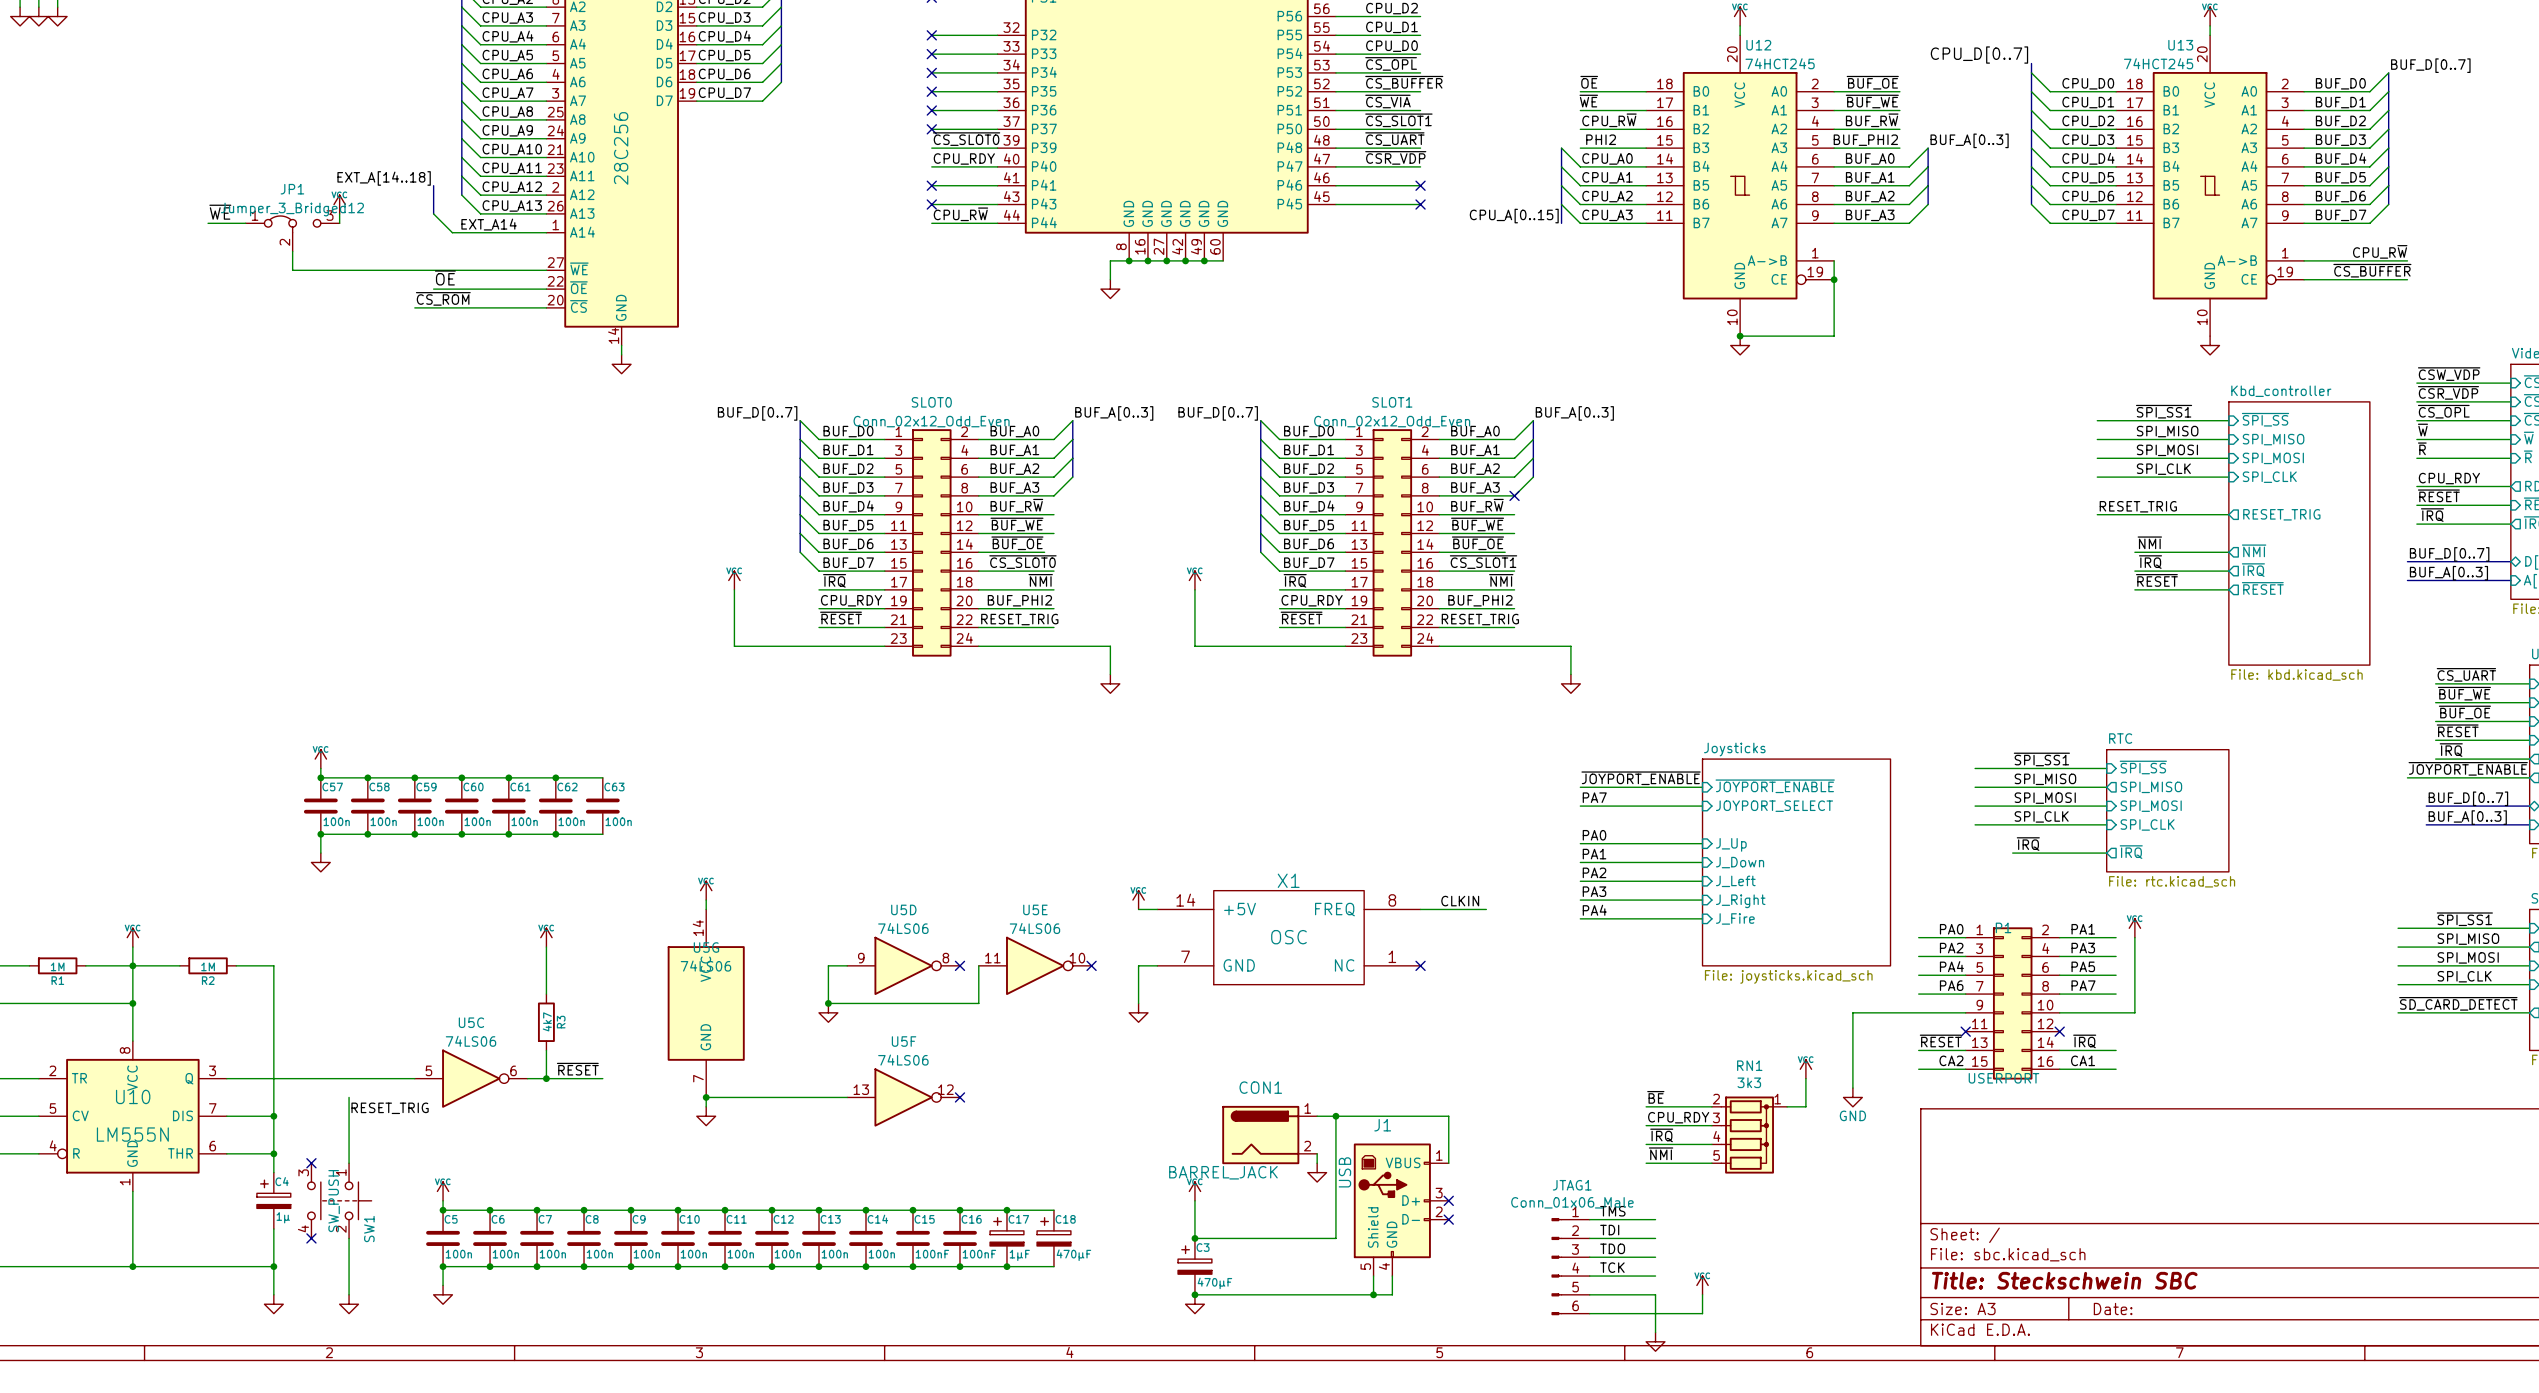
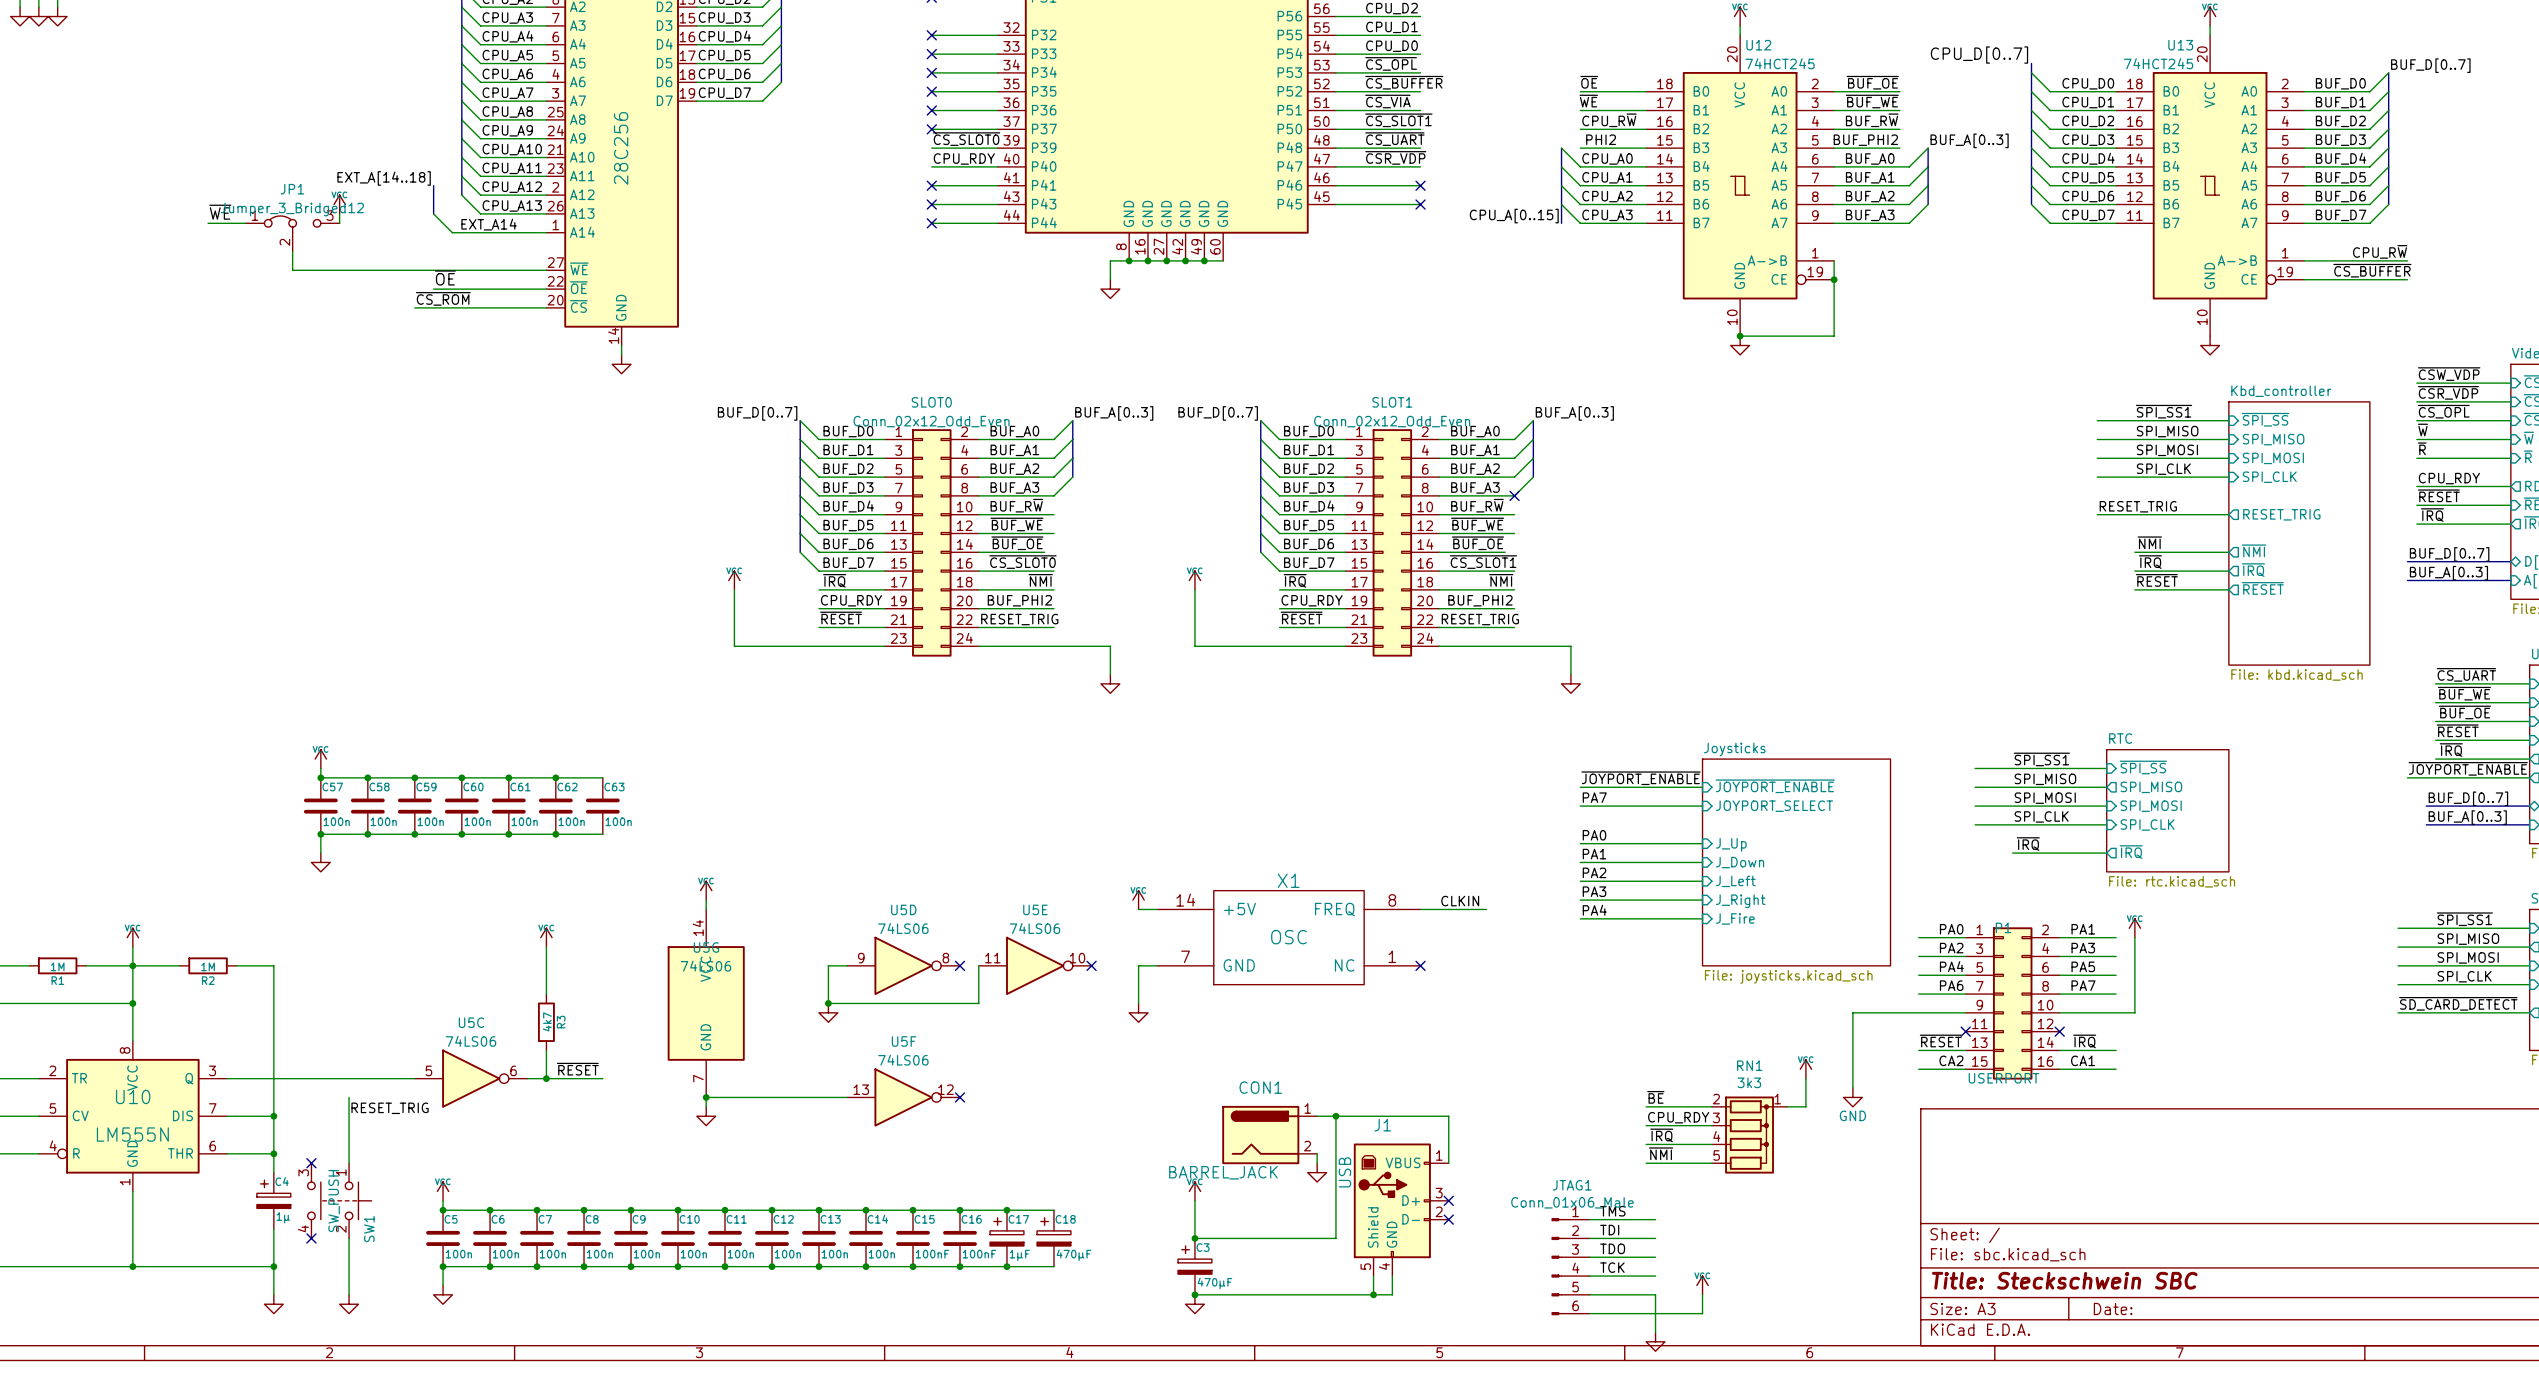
label: CPU_R~{W} (960, 214) -> none
no-connect mark: none -> (931, 223)

